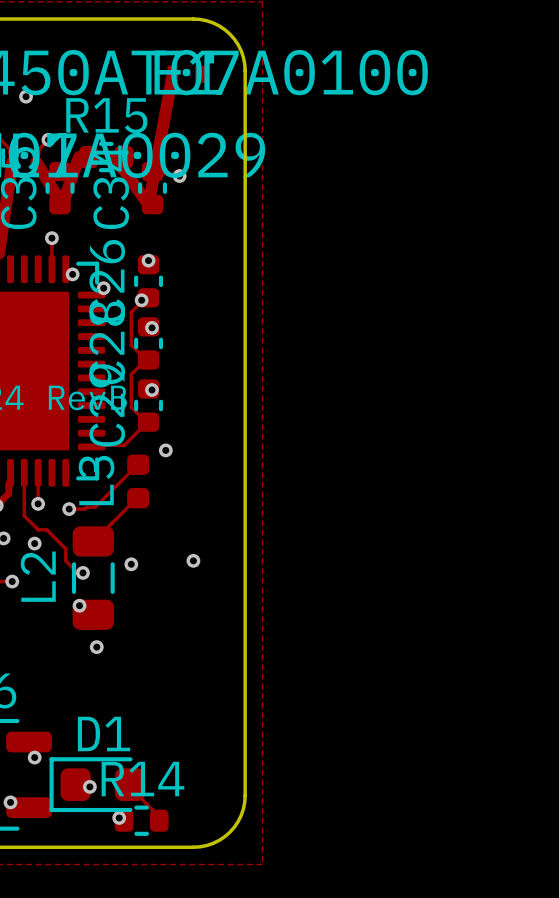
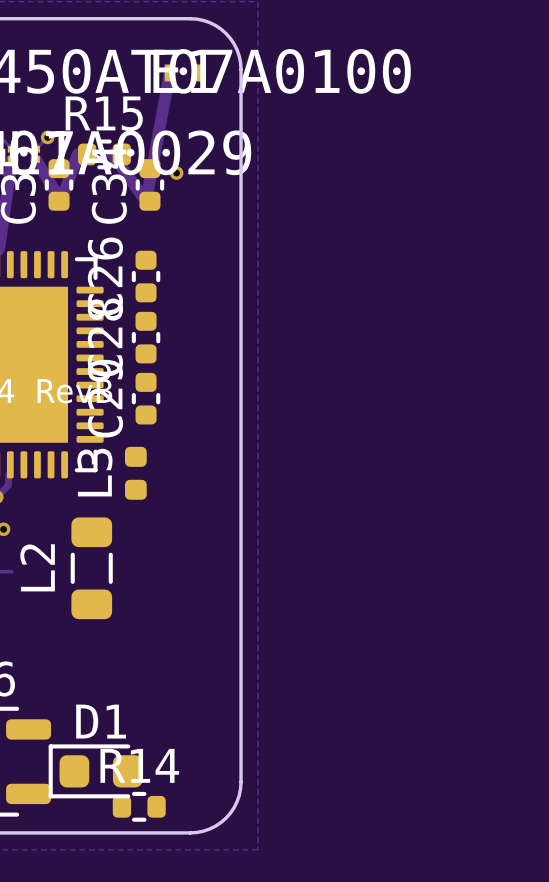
via: (26, 96) -> none
track: (51, 238) (51, 257) -> none
via: (51, 238) -> none
via: (148, 260) -> none
via: (72, 274) -> none
via: (103, 288) -> none
via: (141, 300) -> none
track: (141, 303) (131, 312) (131, 345) (141, 355) -> none
via: (152, 327) -> none
track: (141, 365) (131, 374) (131, 407) (141, 417) -> none
via: (152, 390) -> none
track: (141, 427) (124, 445) (103, 445) -> none
via: (165, 450) -> none
track: (131, 471) (95, 507) (69, 509) -> none
track: (24, 483) (24, 515) (38, 529) (46, 529) (65, 548) (65, 560) (77, 572) (82, 572) -> none
track: (38, 483) (38, 503) -> none
via: (38, 503) -> none
track: (131, 503) (107, 528) (107, 533) -> none
via: (69, 509) -> none
via: (34, 543) -> none
via: (193, 560) -> none
via: (131, 564) -> none
via: (82, 572) -> none
via: (12, 581) -> none
via: (79, 605) -> none
via: (96, 647) -> none
via: (34, 757) -> none
via: (89, 786) -> none
track: (138, 795) (153, 811) (153, 814) -> none
via: (10, 802) -> none
via: (119, 817) -> none

